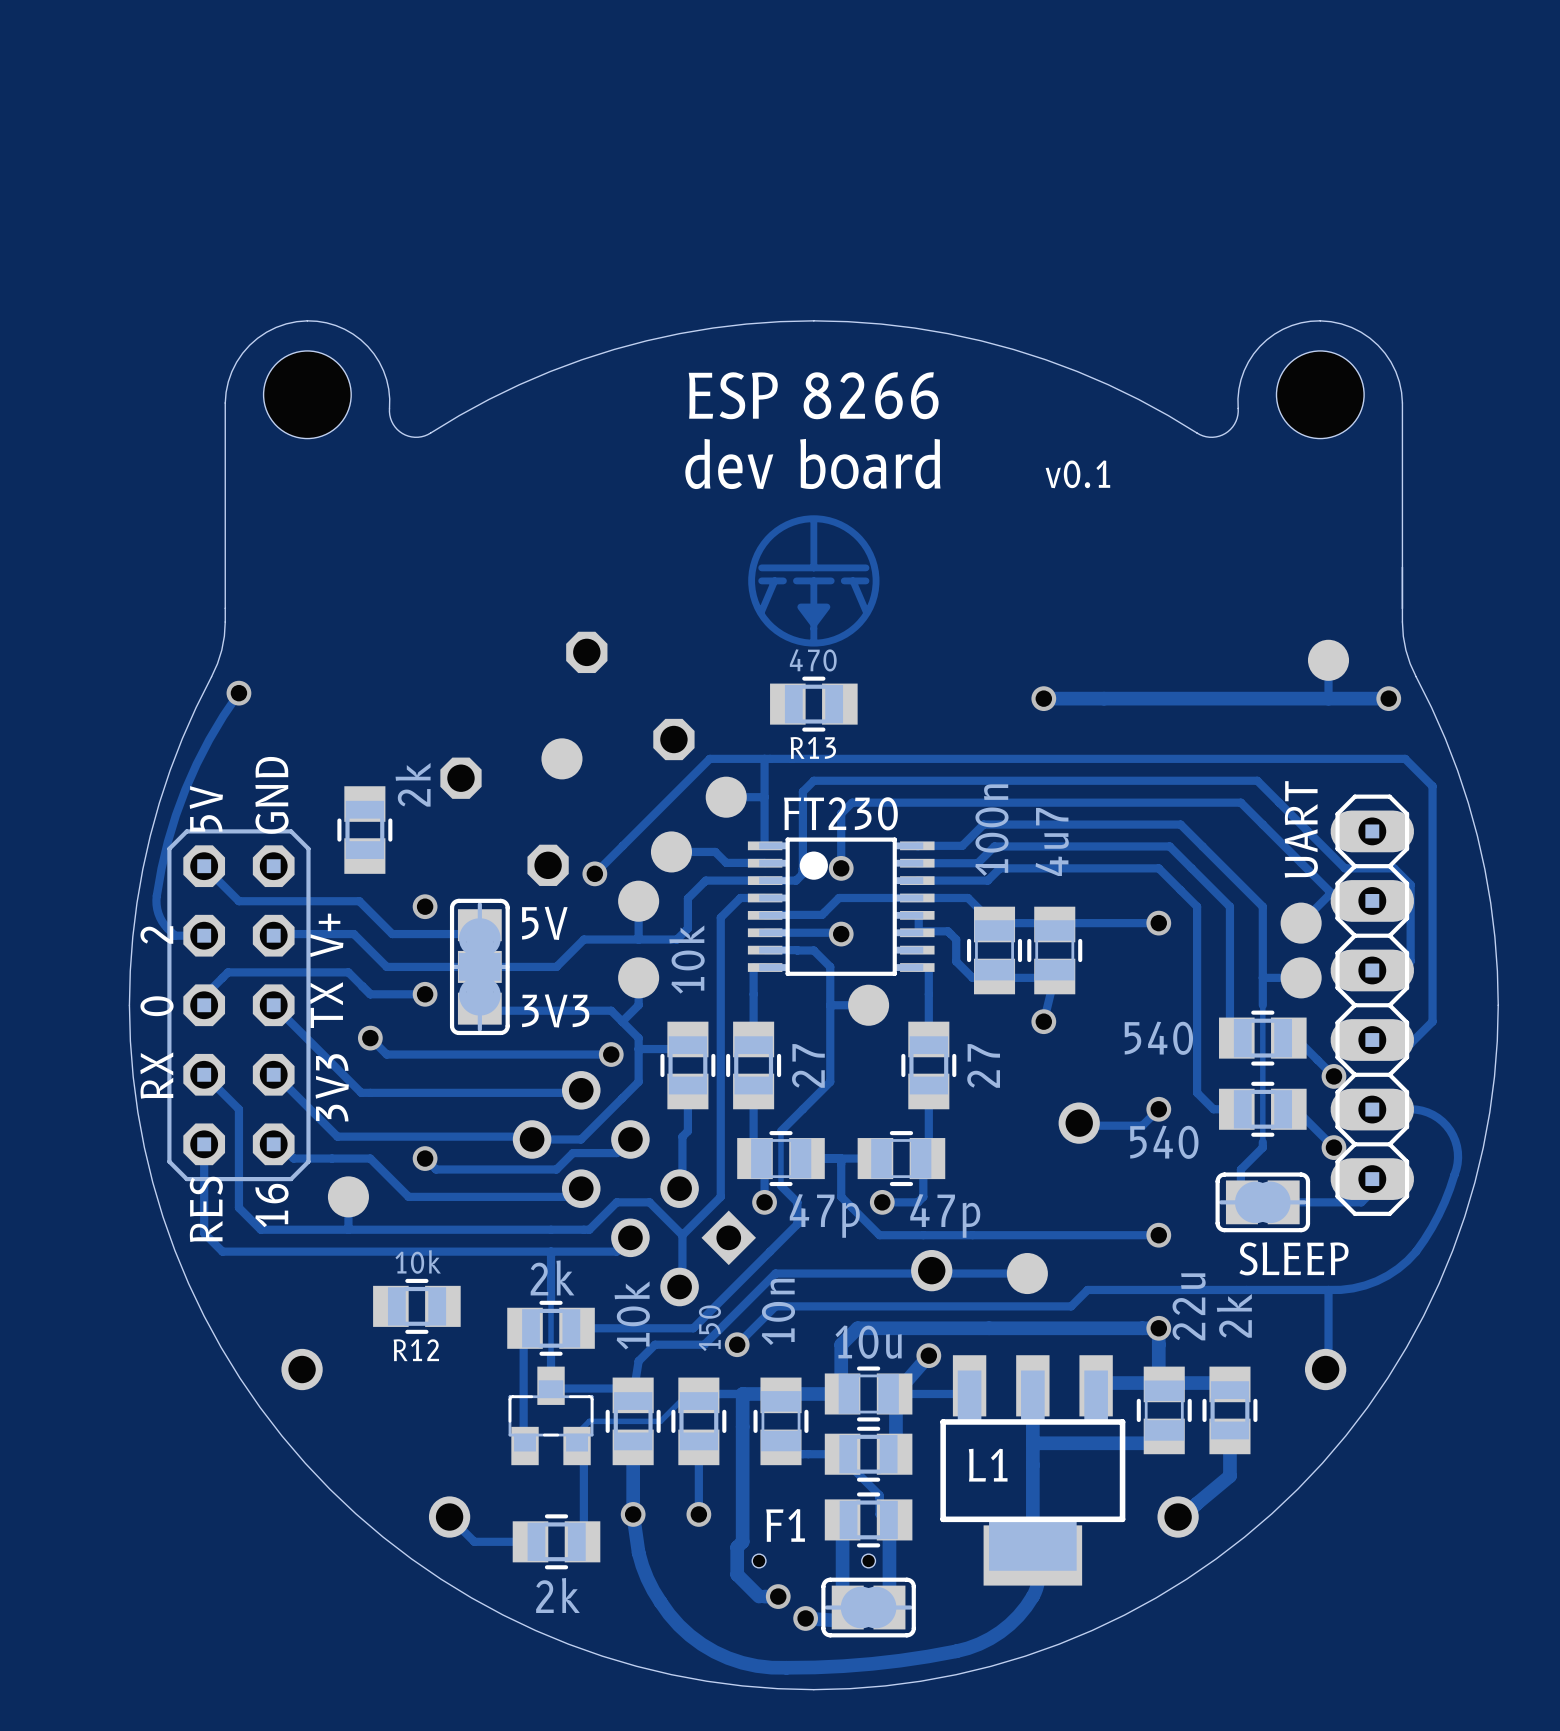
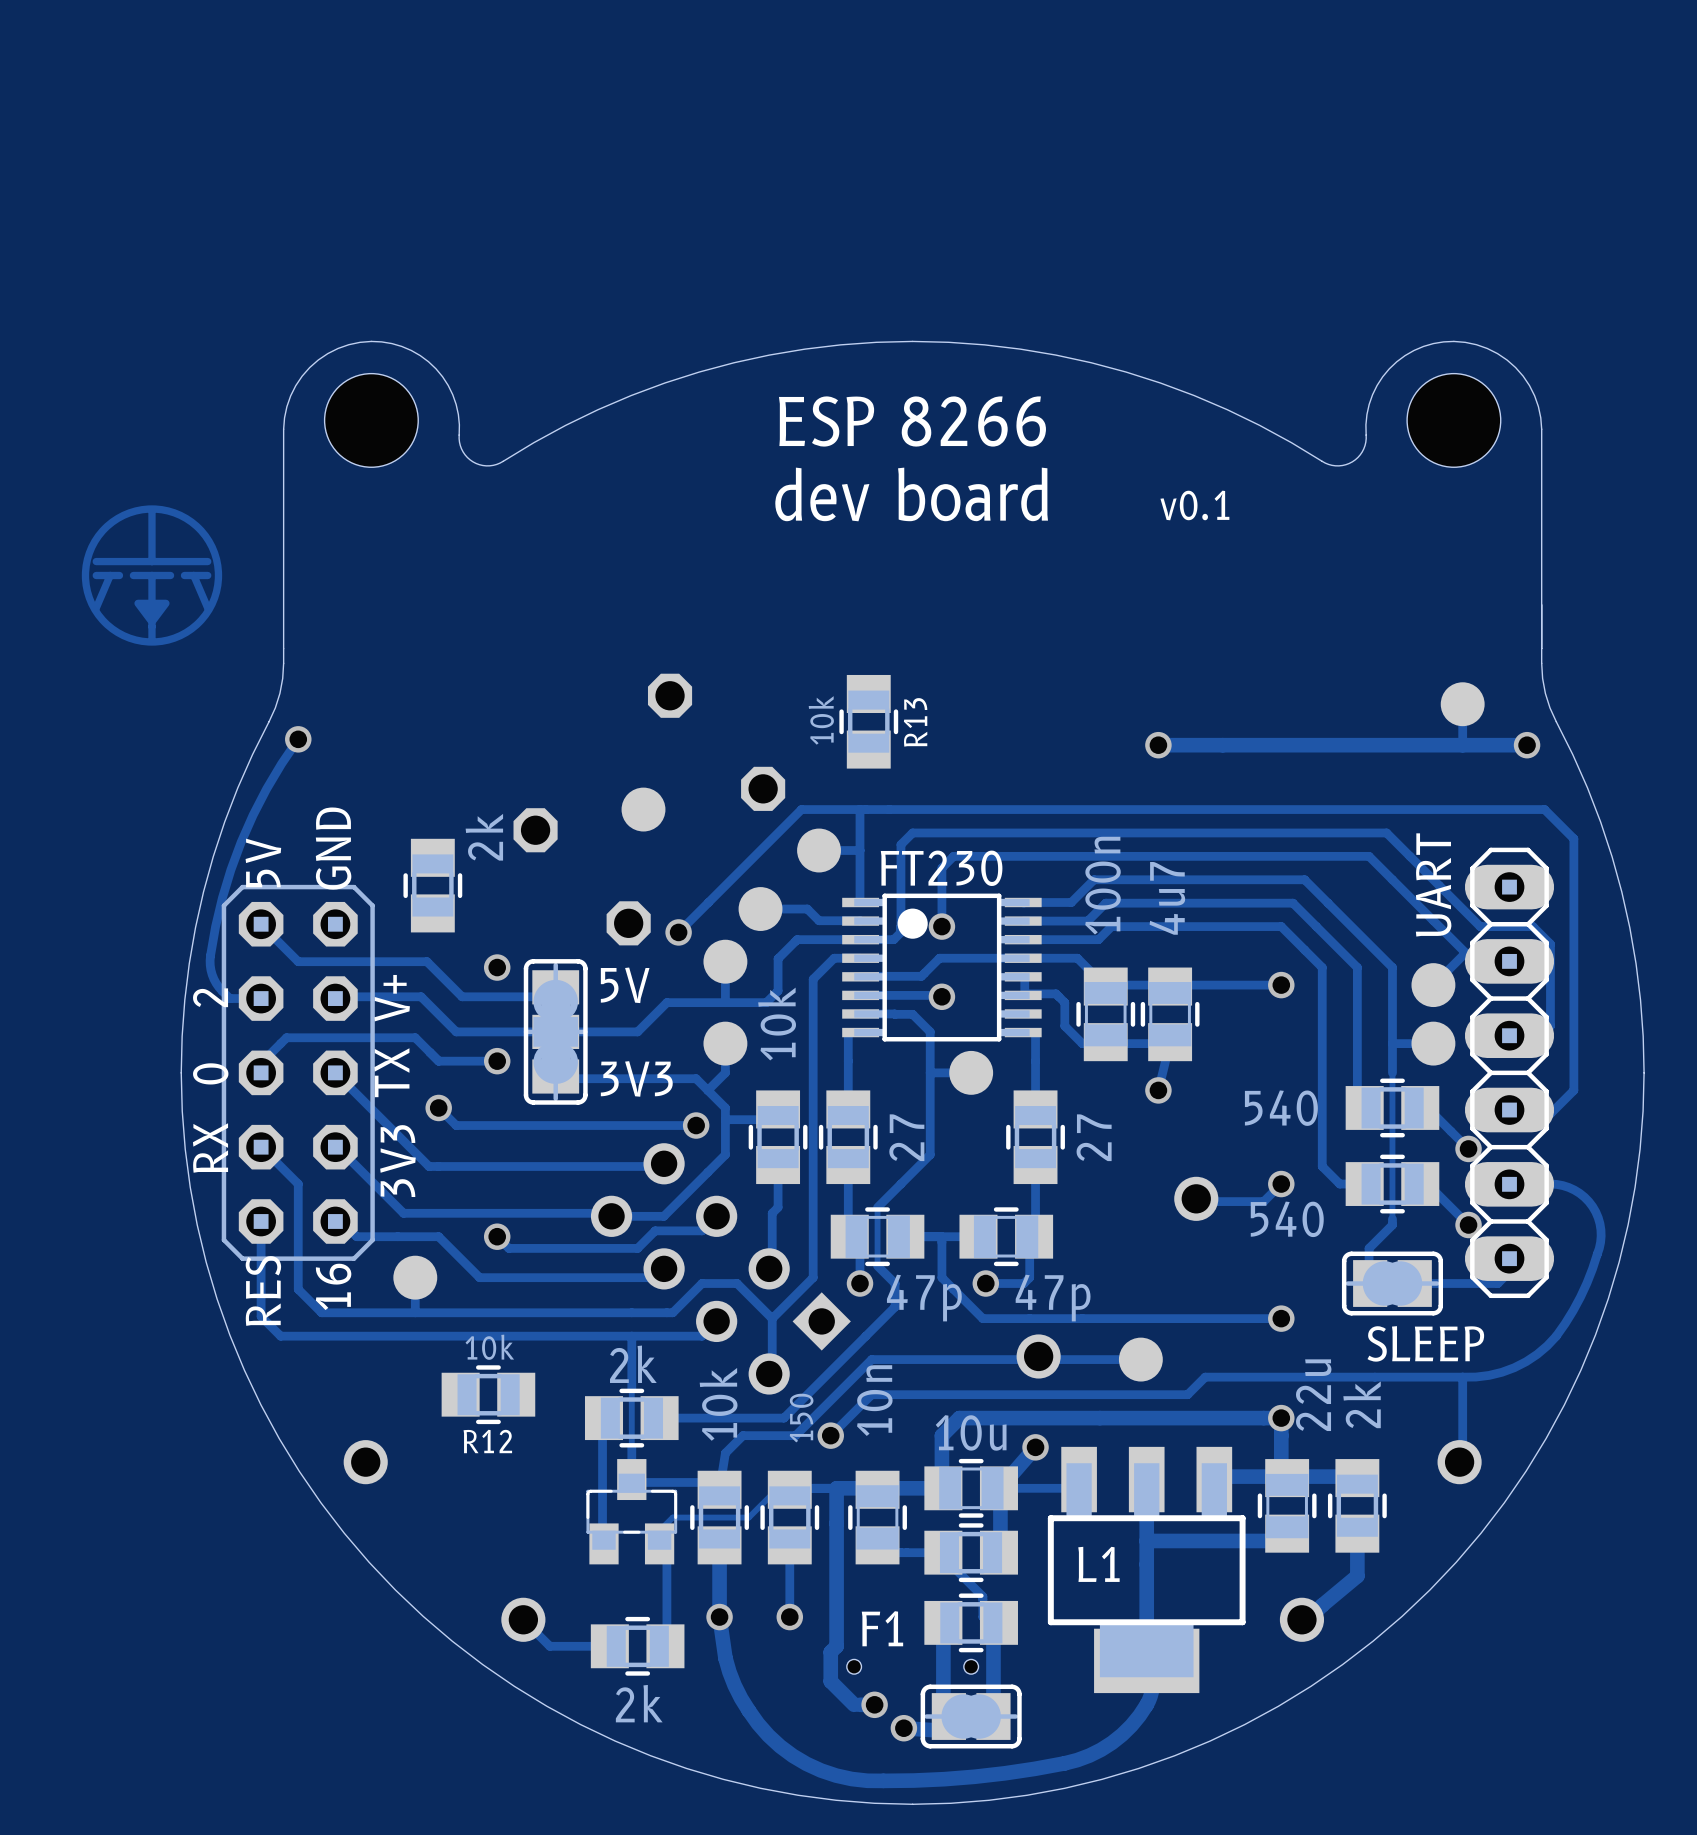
drawing: none -> [81, 505, 223, 646]
drawing: [748, 515, 880, 647] -> none
R13 value: 470 (813, 660) -> 10k (821, 720)
R13 rotation: 0° (813, 704) -> 90° clockwise (868, 721)
R13 name position: R13 (813, 747) -> R13 (915, 722)

